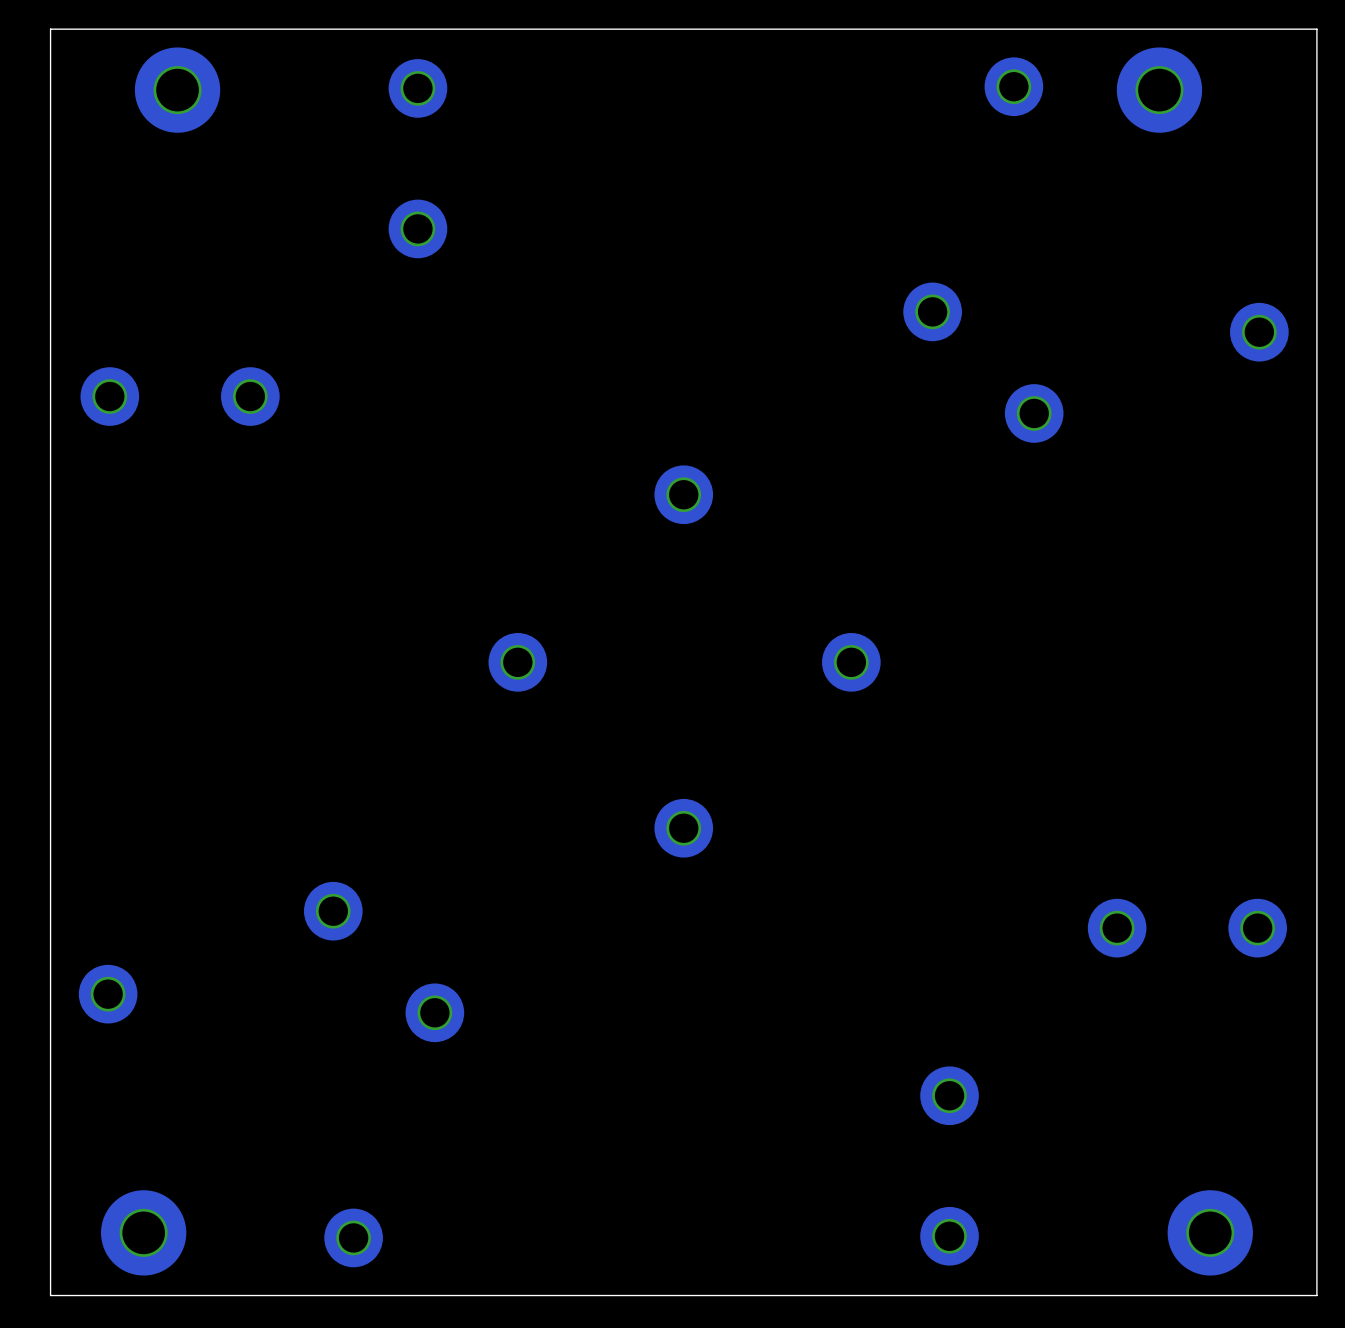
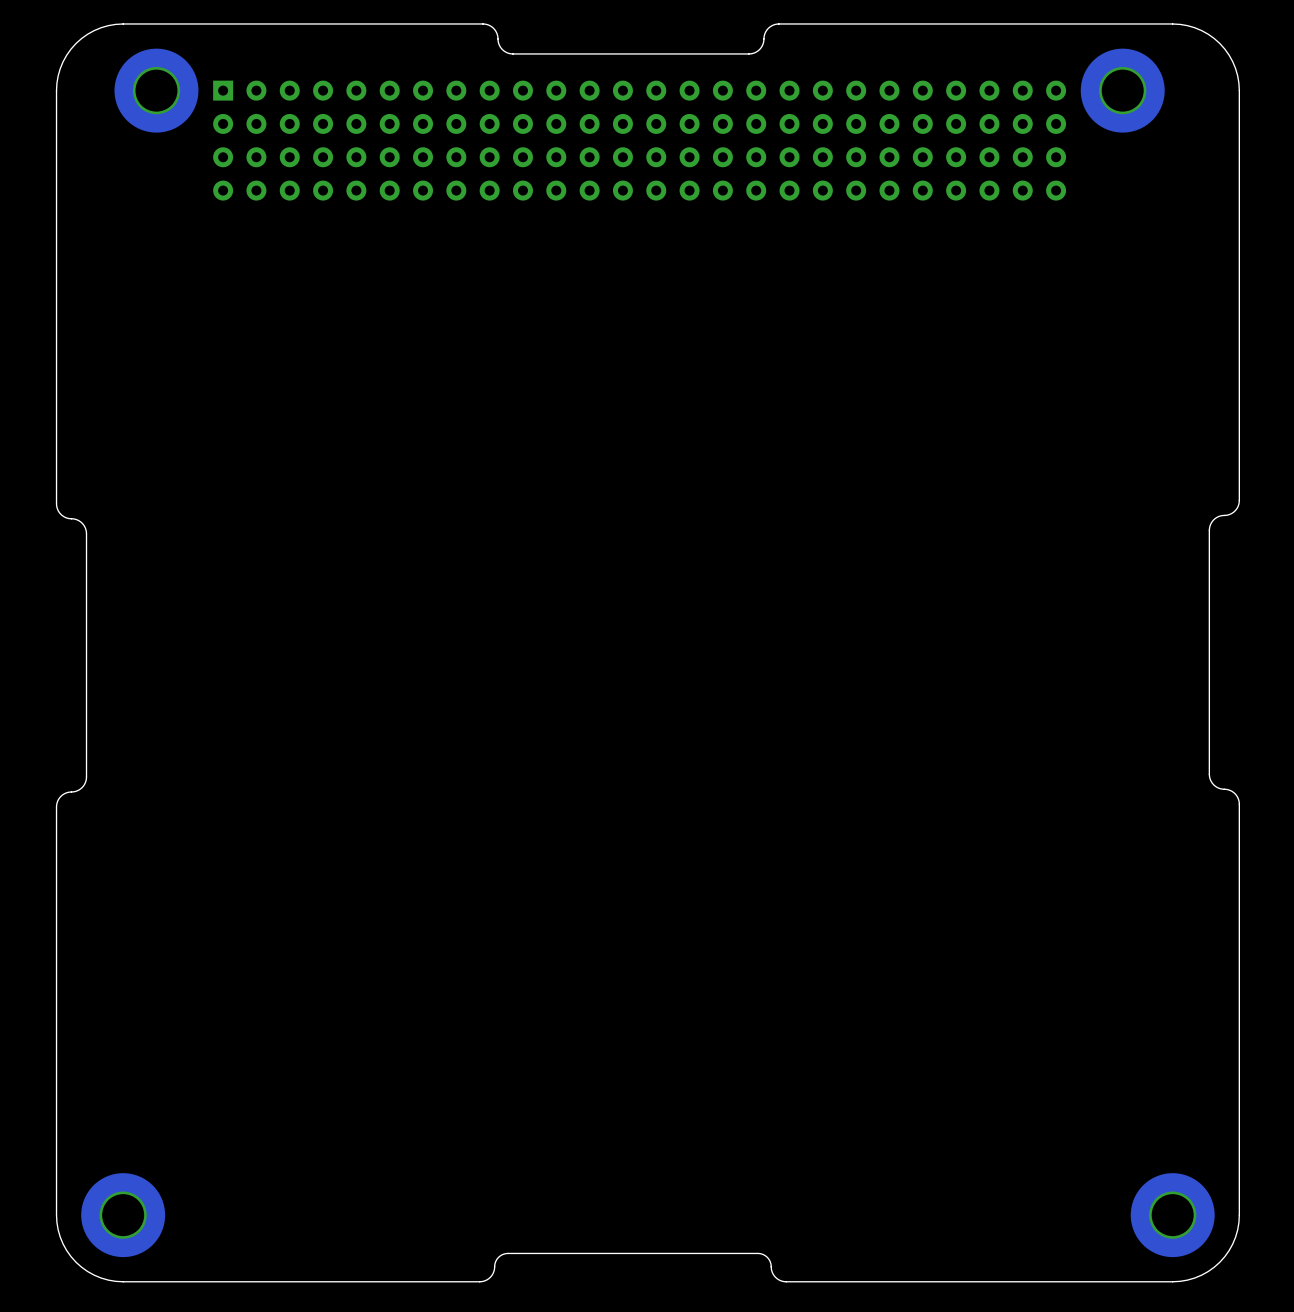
board edge: (1316, 29) (1316, 1295) (50, 1295) (50, 29) (1316, 29) -> (1172, 23) (1194, 27) (1208, 34) (1219, 43) (1232, 61) (1237, 75) (1239, 90) (1239, 502) (1233, 512) (1213, 519) (1209, 530) (1209, 776) (1215, 786) (1234, 793) (1239, 804) (1239, 1215) (1235, 1237) (1224, 1256) (1214, 1267) (1201, 1275) (1187, 1280) (1172, 1281) (784, 1281) (774, 1275) (767, 1257) (757, 1253) (506, 1253) (497, 1258) (490, 1277) (479, 1281) (123, 1281) (101, 1278) (81, 1267) (71, 1256) (63, 1244) (58, 1229) (56, 1215) (56, 805) (62, 795) (82, 787) (86, 776) (86, 531) (80, 521) (60, 514) (56, 503) (56, 90) (60, 68) (71, 49) (81, 38) (94, 30) (108, 25) (123, 23) (484, 24) (494, 29) (502, 49) (512, 53) (750, 53) (760, 48) (768, 28) (778, 23) (1172, 23)
part: (1013, 86) -> none
part: (417, 88) -> none
part: none -> (639, 140)
part: (417, 228) -> none
part: (932, 311) -> none
part: (1259, 332) -> none
part: (109, 396) -> none
part: (250, 396) -> none
part: (1034, 413) -> none
part: (683, 494) -> none
part: (517, 662) -> none
part: (851, 662) -> none
part: (683, 828) -> none
part: (333, 911) -> none
part: (1117, 928) -> none
part: (1257, 928) -> none
part: (108, 994) -> none
part: (434, 1012) -> none
part: (949, 1095) -> none
part: (949, 1236) -> none
part: (353, 1237) -> none

